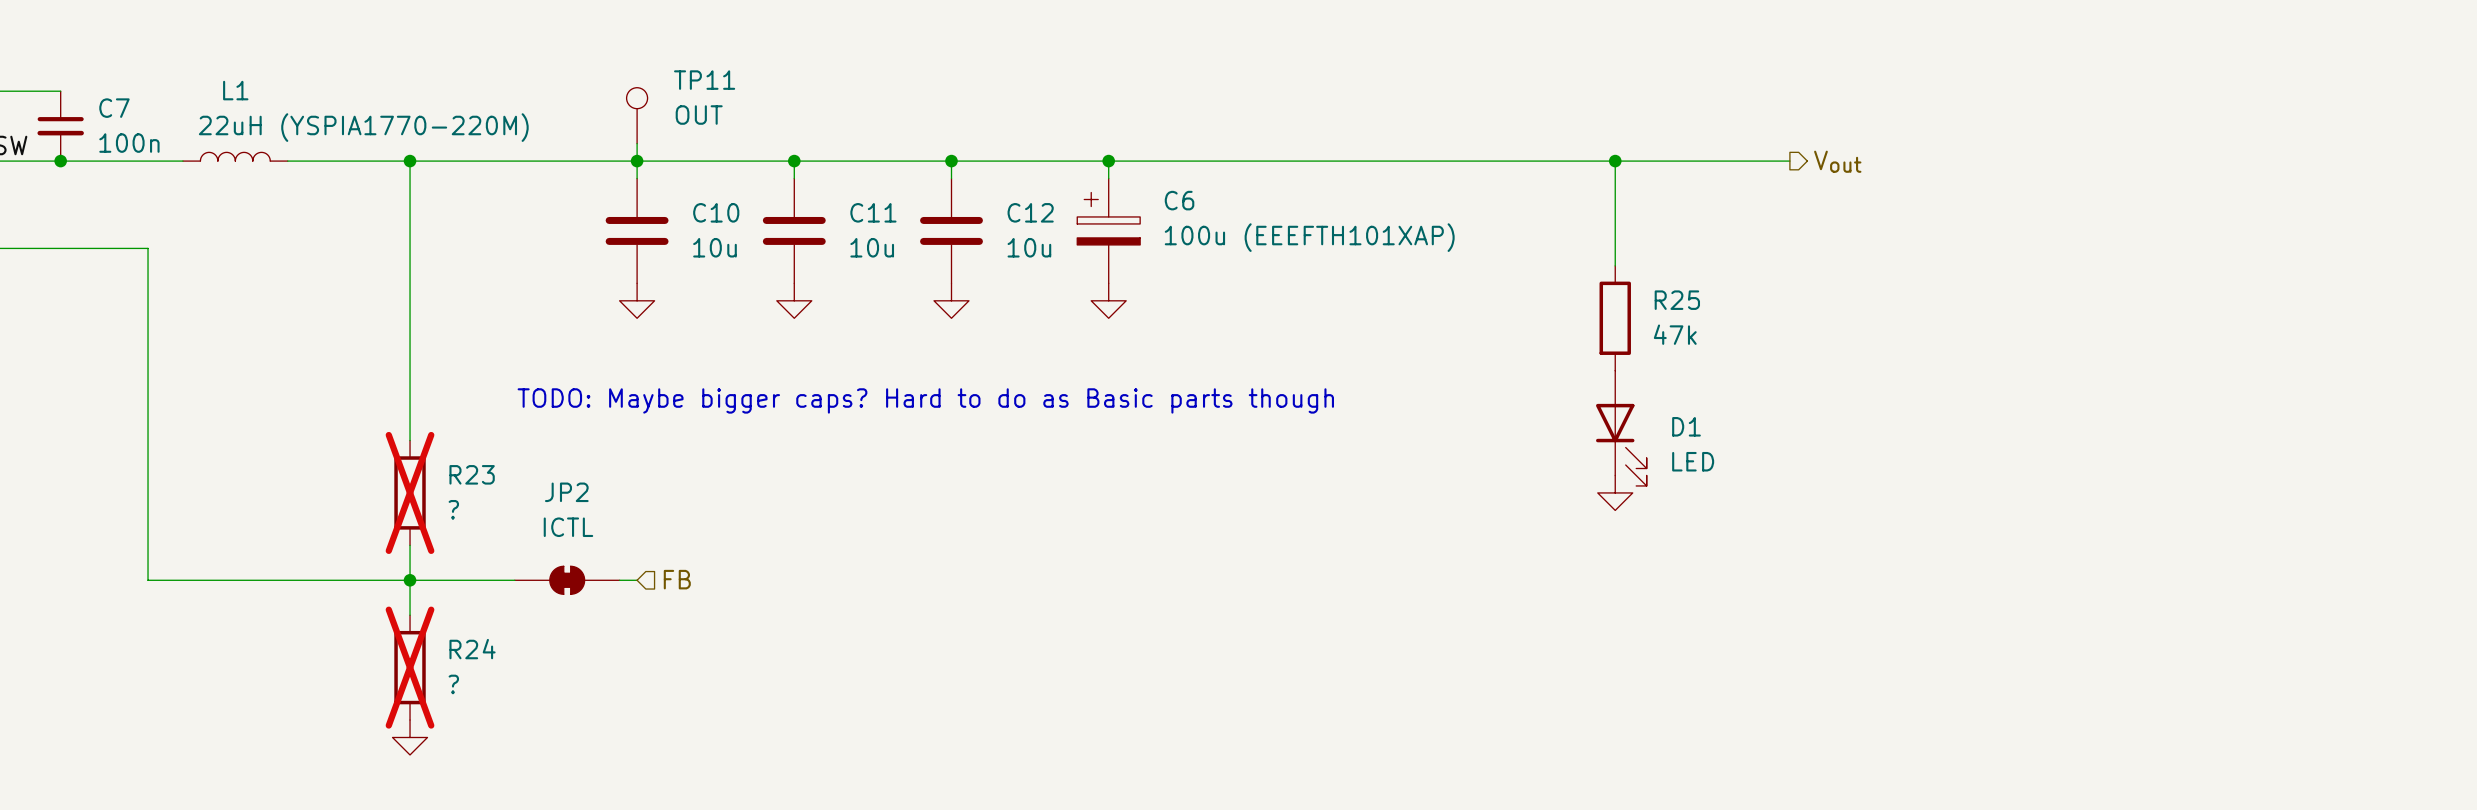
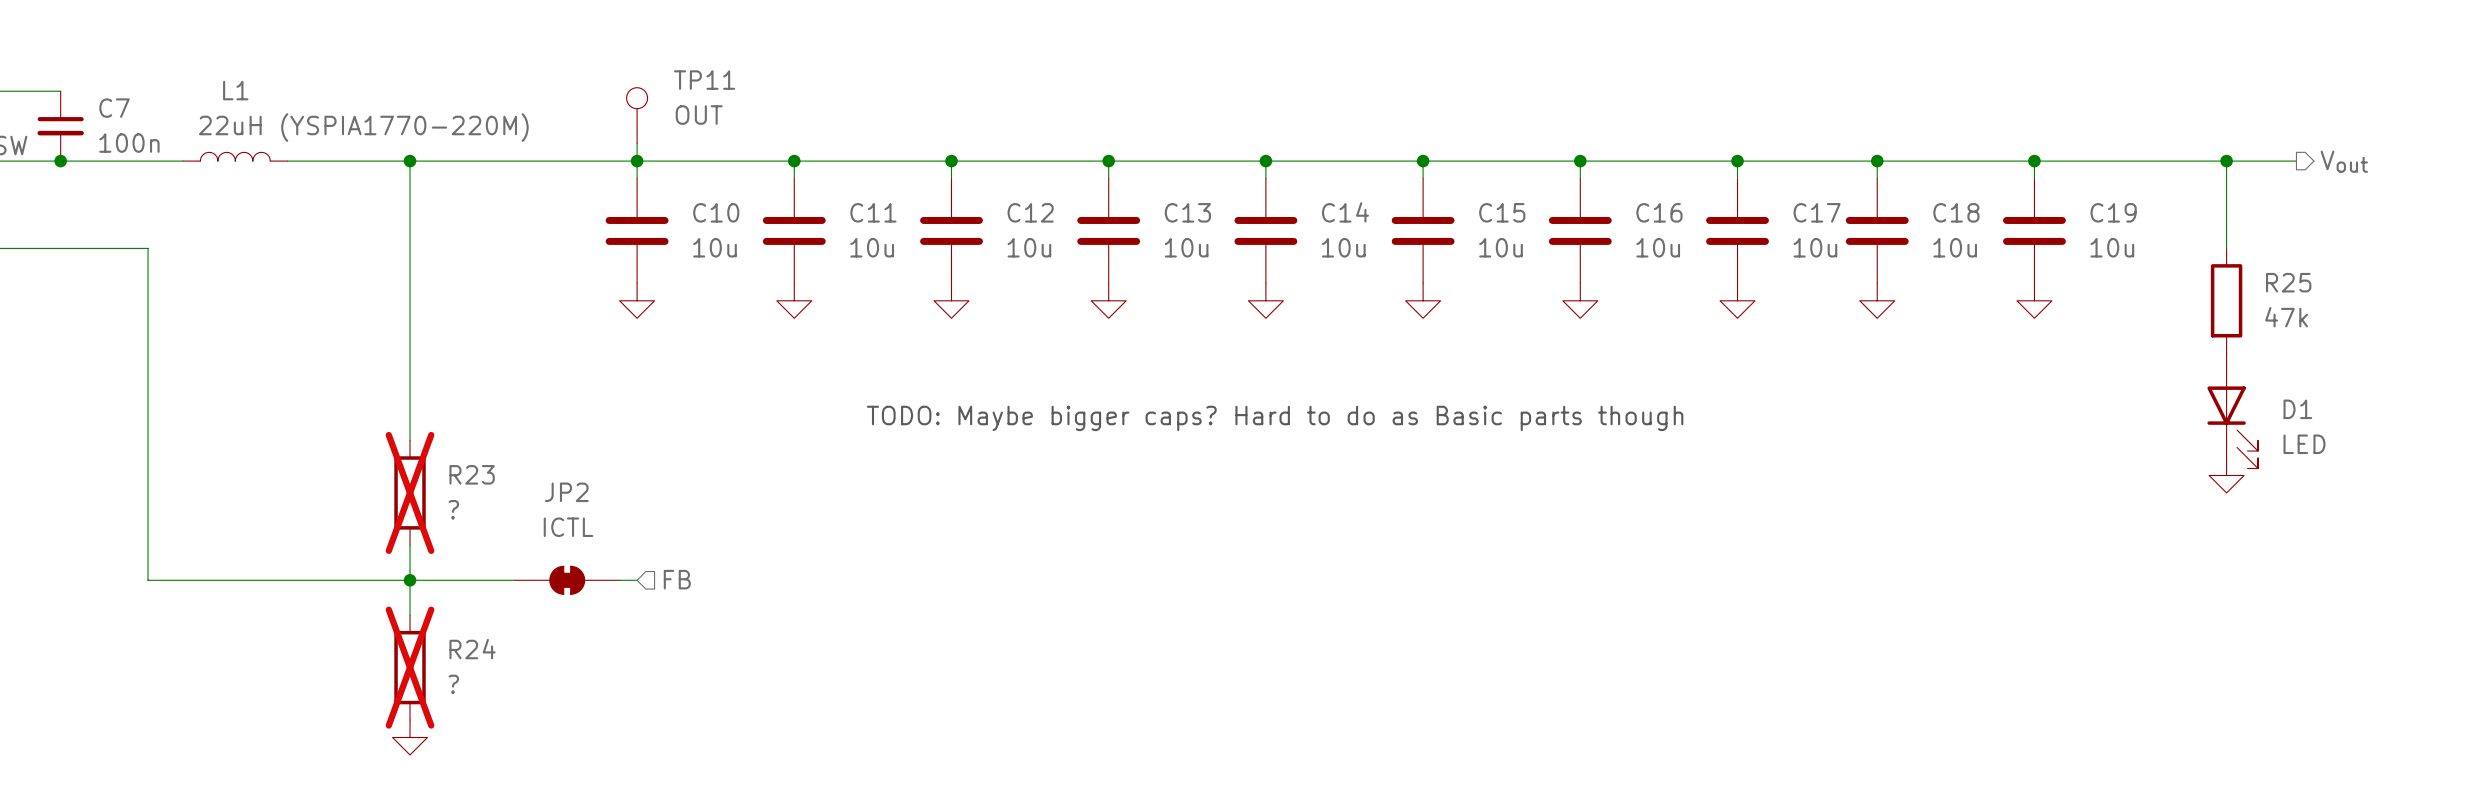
wire: none -> (1265, 161) (1265, 178)
junction: none -> (1265, 161)
wire: none -> (1423, 161) (1423, 178)
junction: none -> (1423, 161)
wire: none -> (1580, 161) (1580, 178)
wire: (1615, 161) (1615, 265) -> none
junction position: (1615, 161) -> (1580, 161)
wire: none -> (1737, 161) (1737, 178)
junction: none -> (1737, 161)
wire: none -> (1789, 161) (2296, 161)
hierarchical label: Vout (1837, 161) -> none
wire: none -> (1877, 161) (1877, 178)
junction: none -> (1877, 161)
wire: none -> (2034, 161) (2034, 178)
junction: none -> (2034, 161)
wire: none -> (2226, 161) (2226, 248)
junction: none -> (2226, 161)
hierarchical label: none -> Vout (2344, 161)
C6: 100u (EEEFTH101XAP) (1108, 230) -> none
C13: none -> 10u (1108, 230)
C14: none -> 10u (1265, 230)
C15: none -> 10u (1423, 230)
C16: none -> 10u (1580, 230)
C17: none -> 10u (1737, 230)
C18: none -> 10u (1877, 230)
C19: none -> 10u (2034, 230)
power symbol: none -> (1265, 300)
power symbol: none -> (1423, 300)
power symbol: none -> (1580, 300)
power symbol: none -> (1737, 300)
power symbol: none -> (1877, 300)
power symbol: none -> (2034, 300)
R25 position: (1615, 318) -> (2226, 300)
text: TODO: Maybe bigger caps? Hard to do as Basic parts though (925, 400) -> none
text: none -> TODO: Maybe bigger caps? Hard to do as Basic parts though (1275, 418)
D1 position: (1621, 428) -> (2232, 410)
power symbol: none -> (2226, 475)
power symbol: (1615, 492) -> none

